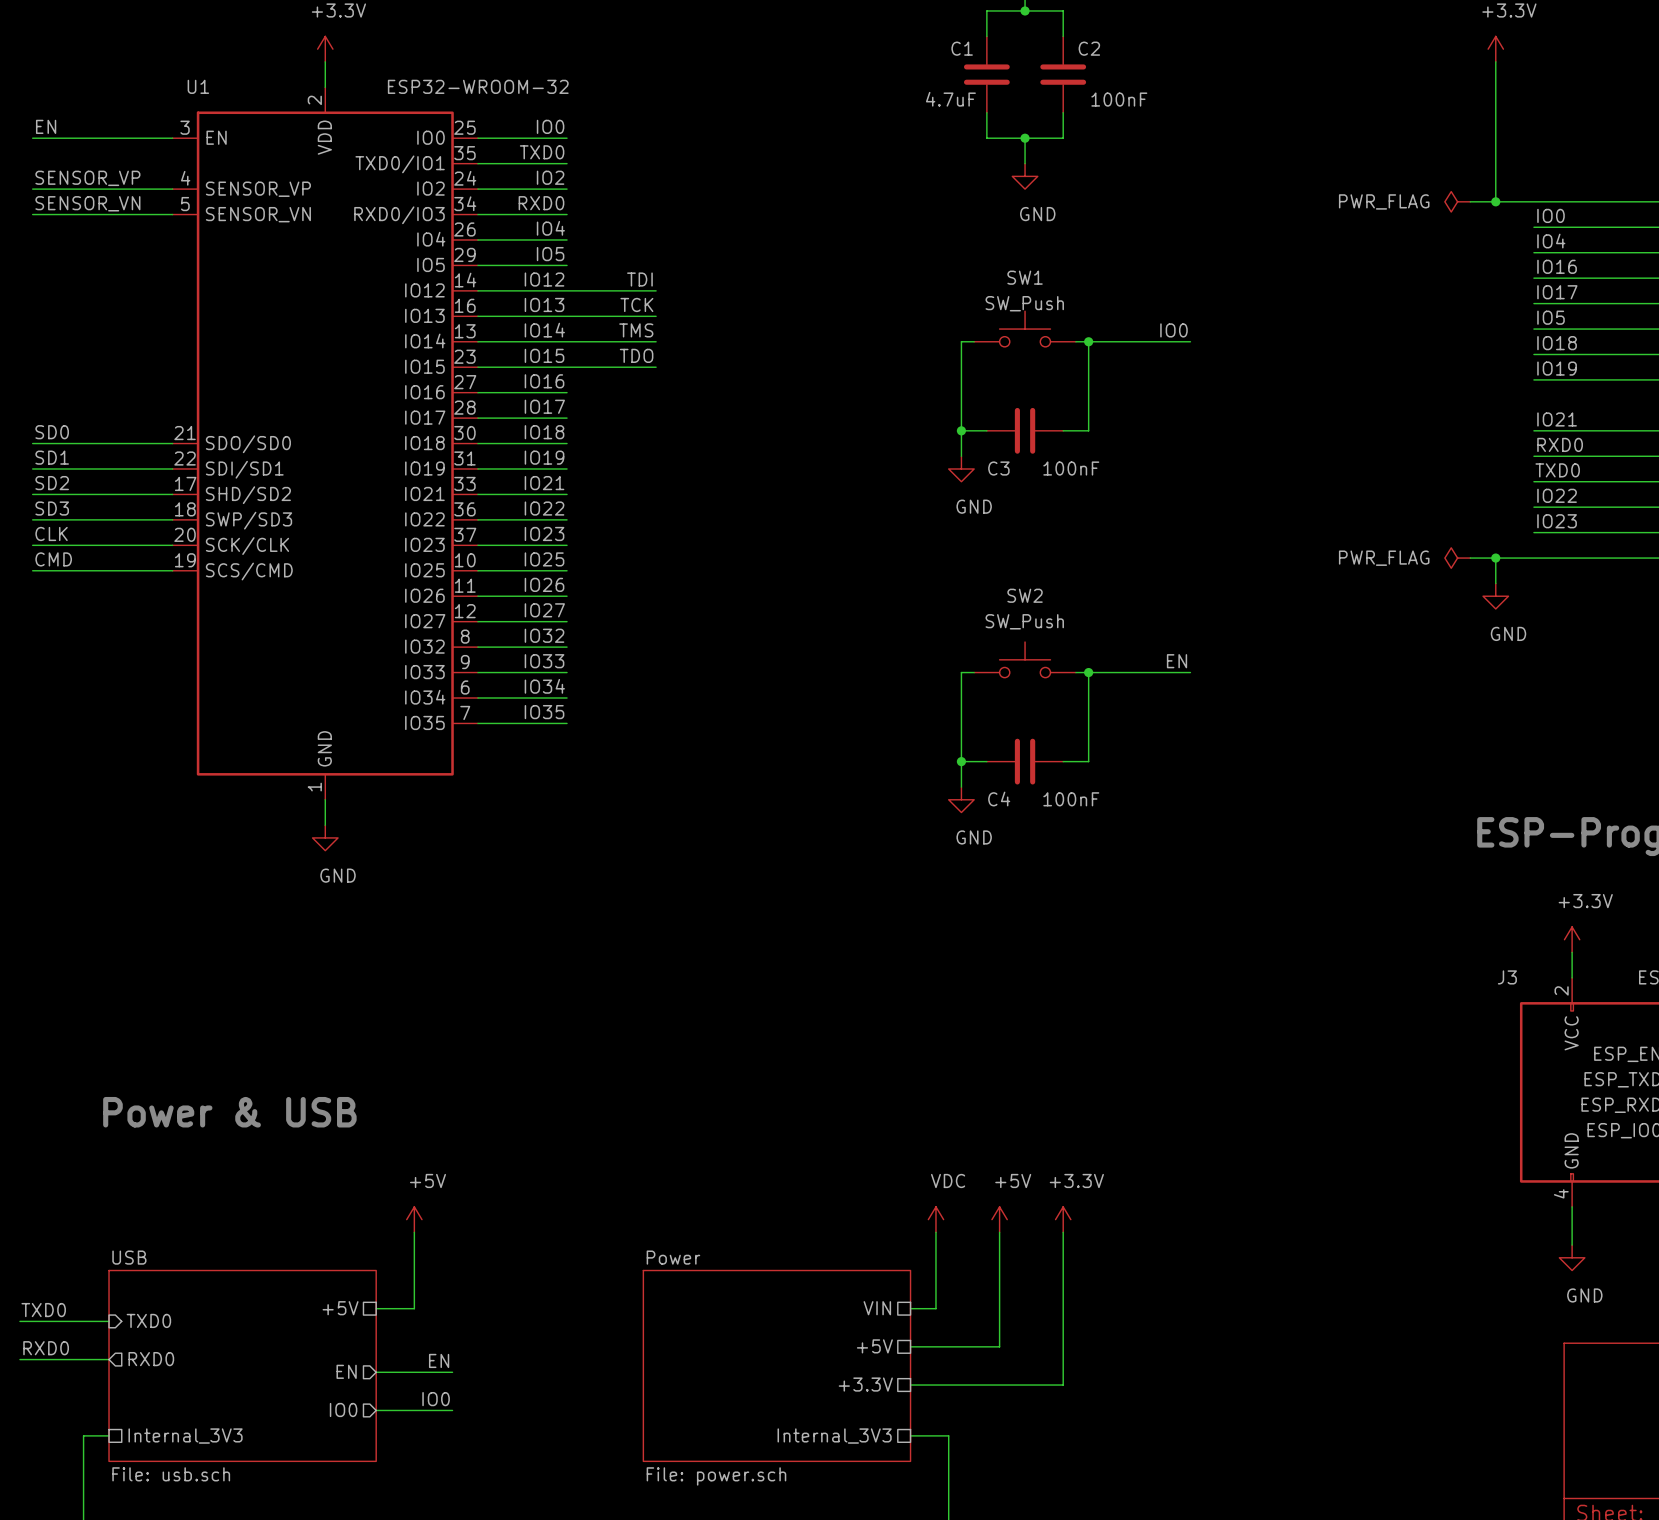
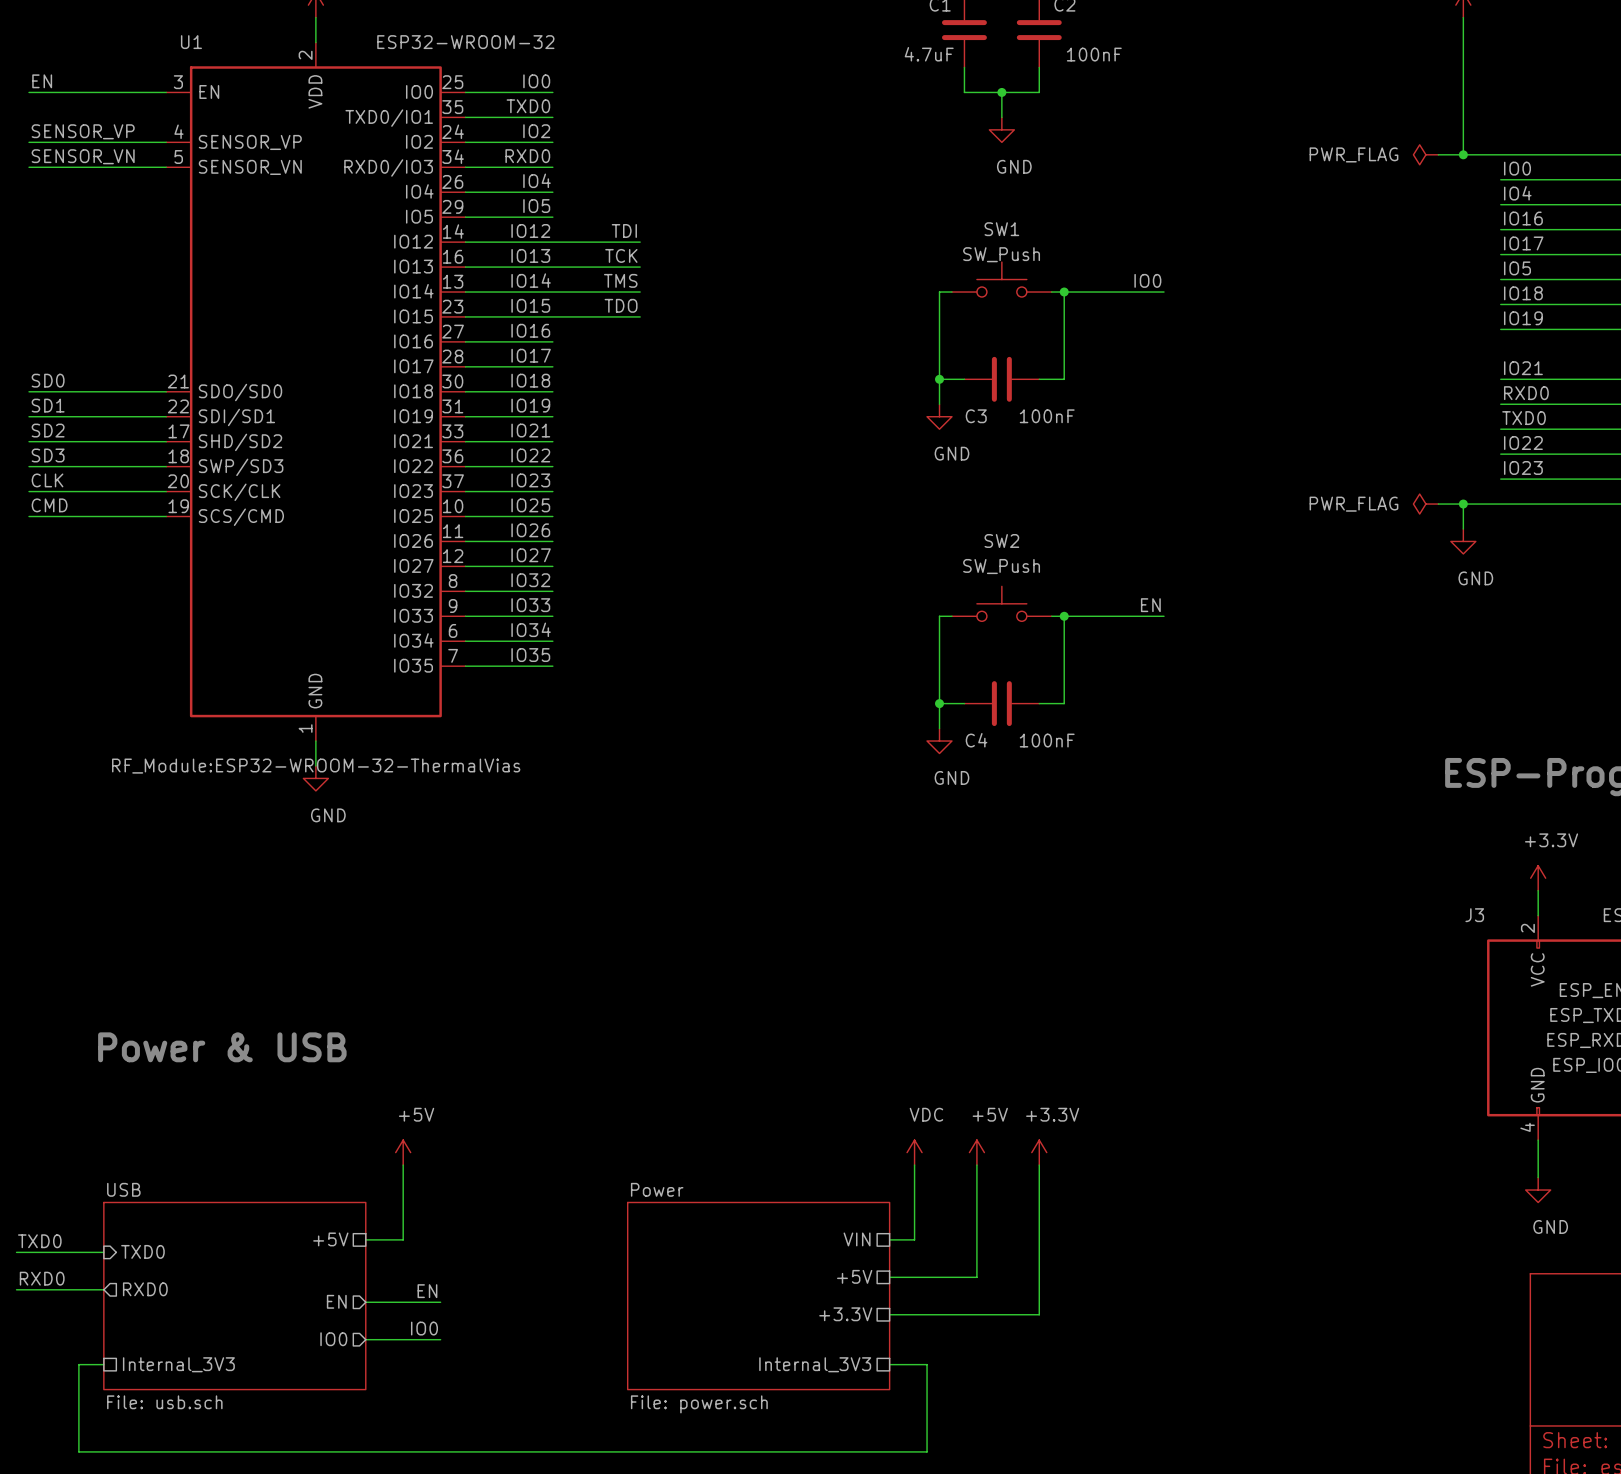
U1 text: none -> RF_Module:ESP32-WROOM-32-ThermalVias (316, 766)

